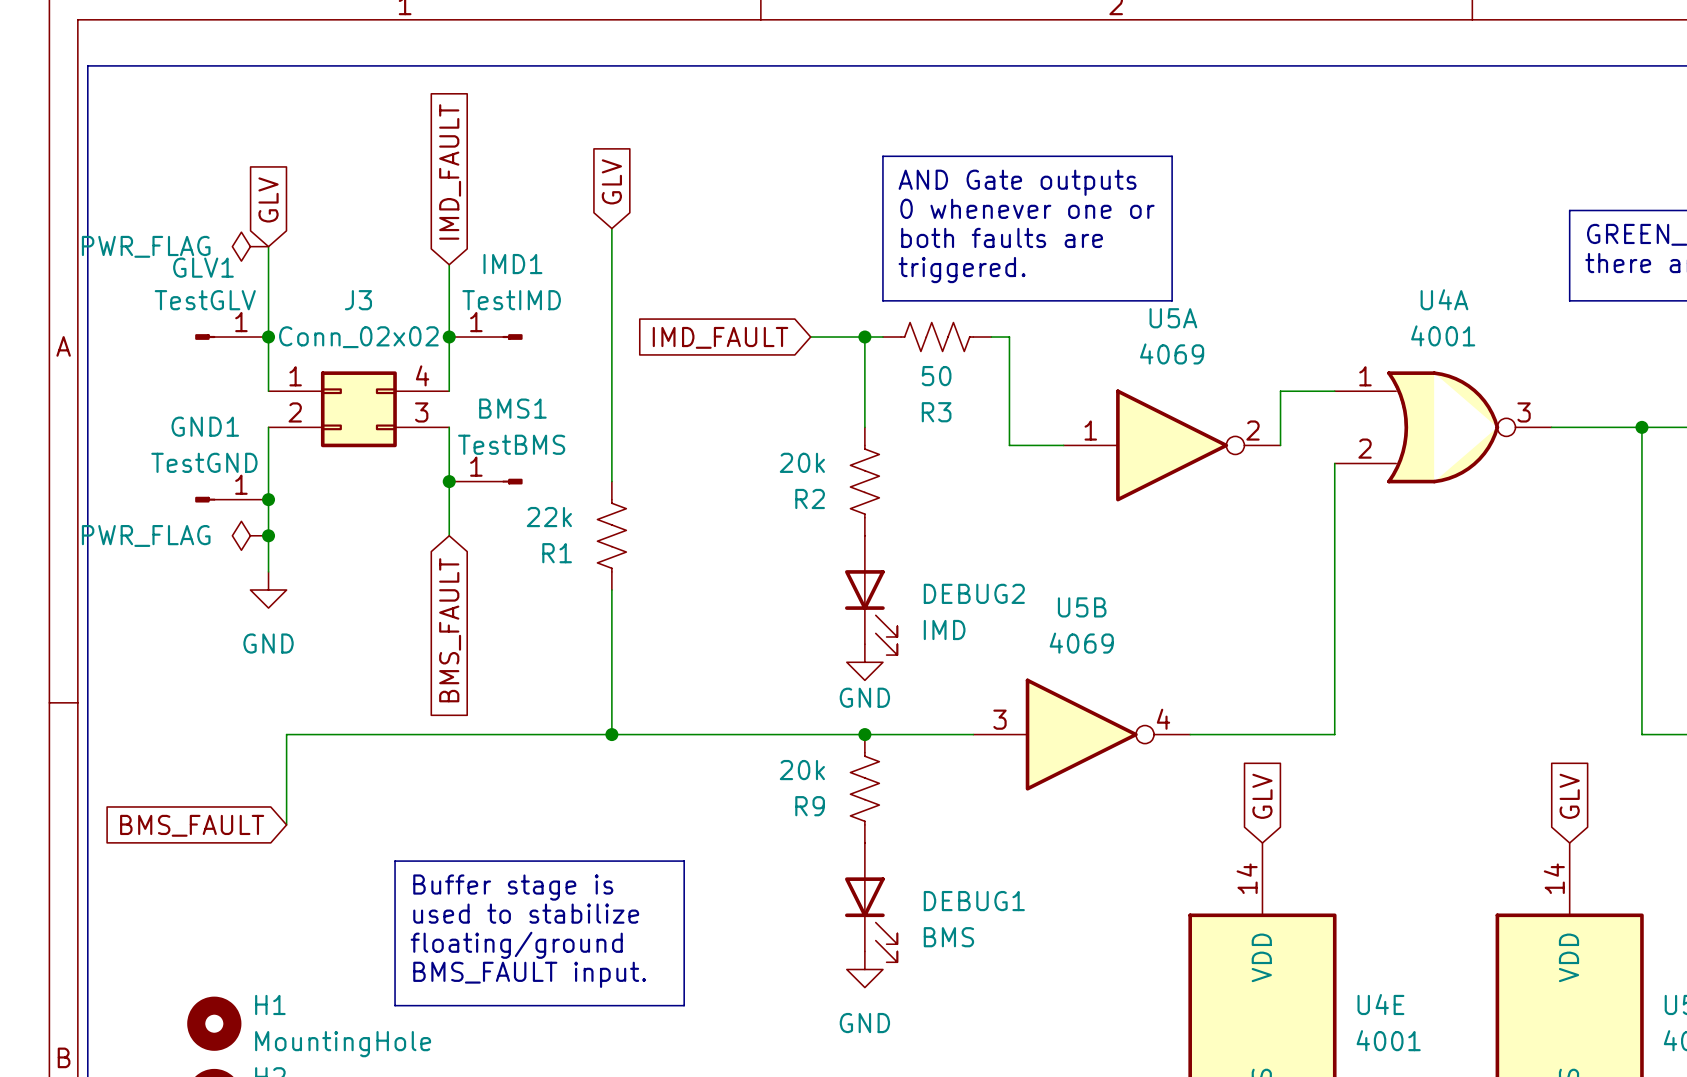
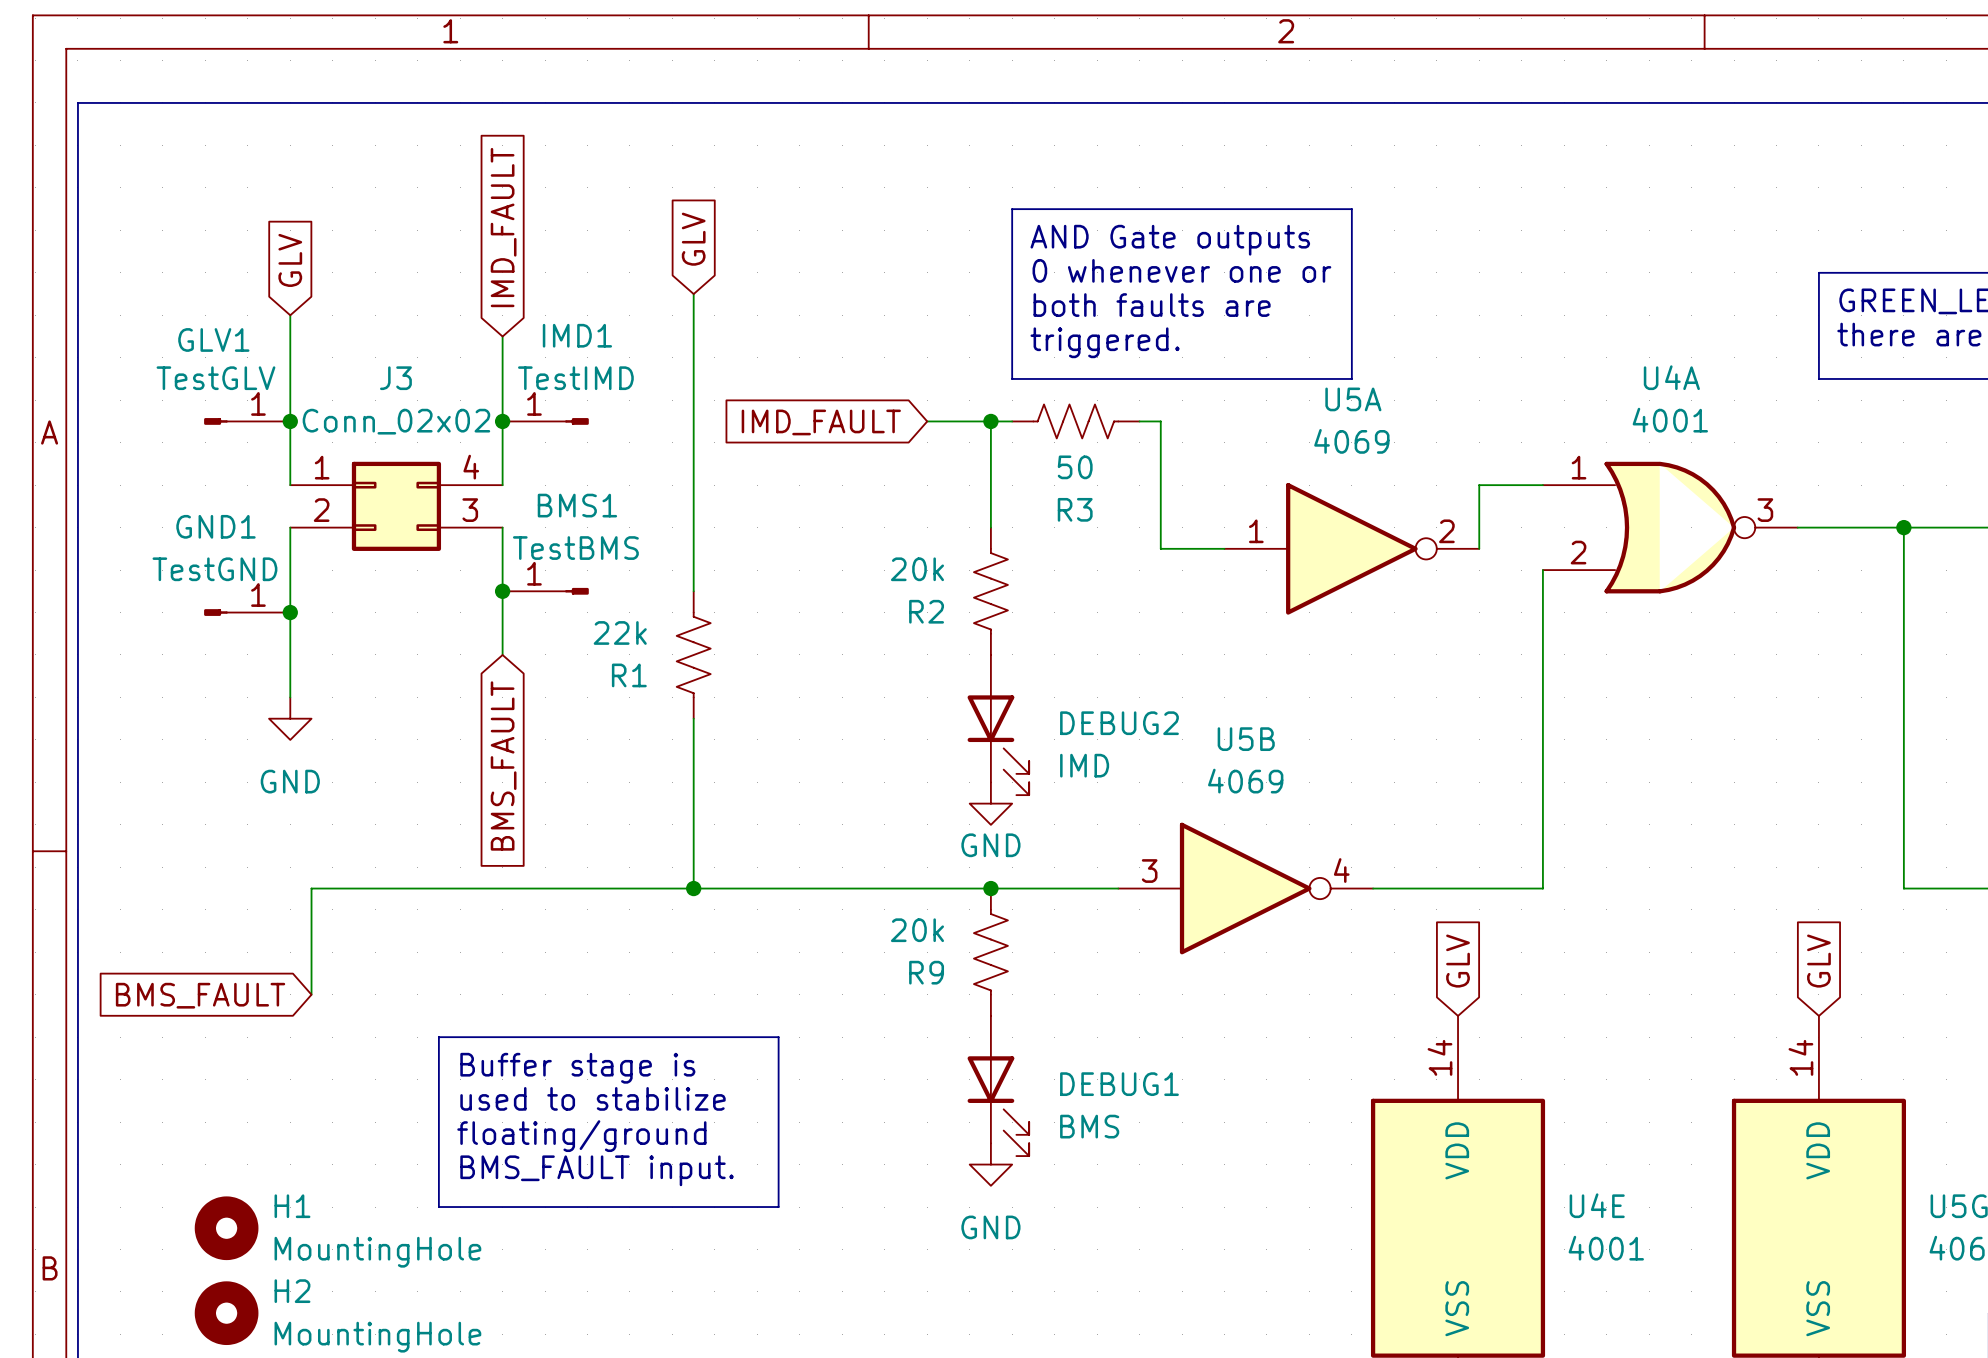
power symbol: PWR_FLAG (250, 246) -> none
power symbol: PWR_FLAG (250, 535) -> none
junction: (268, 535) -> none

